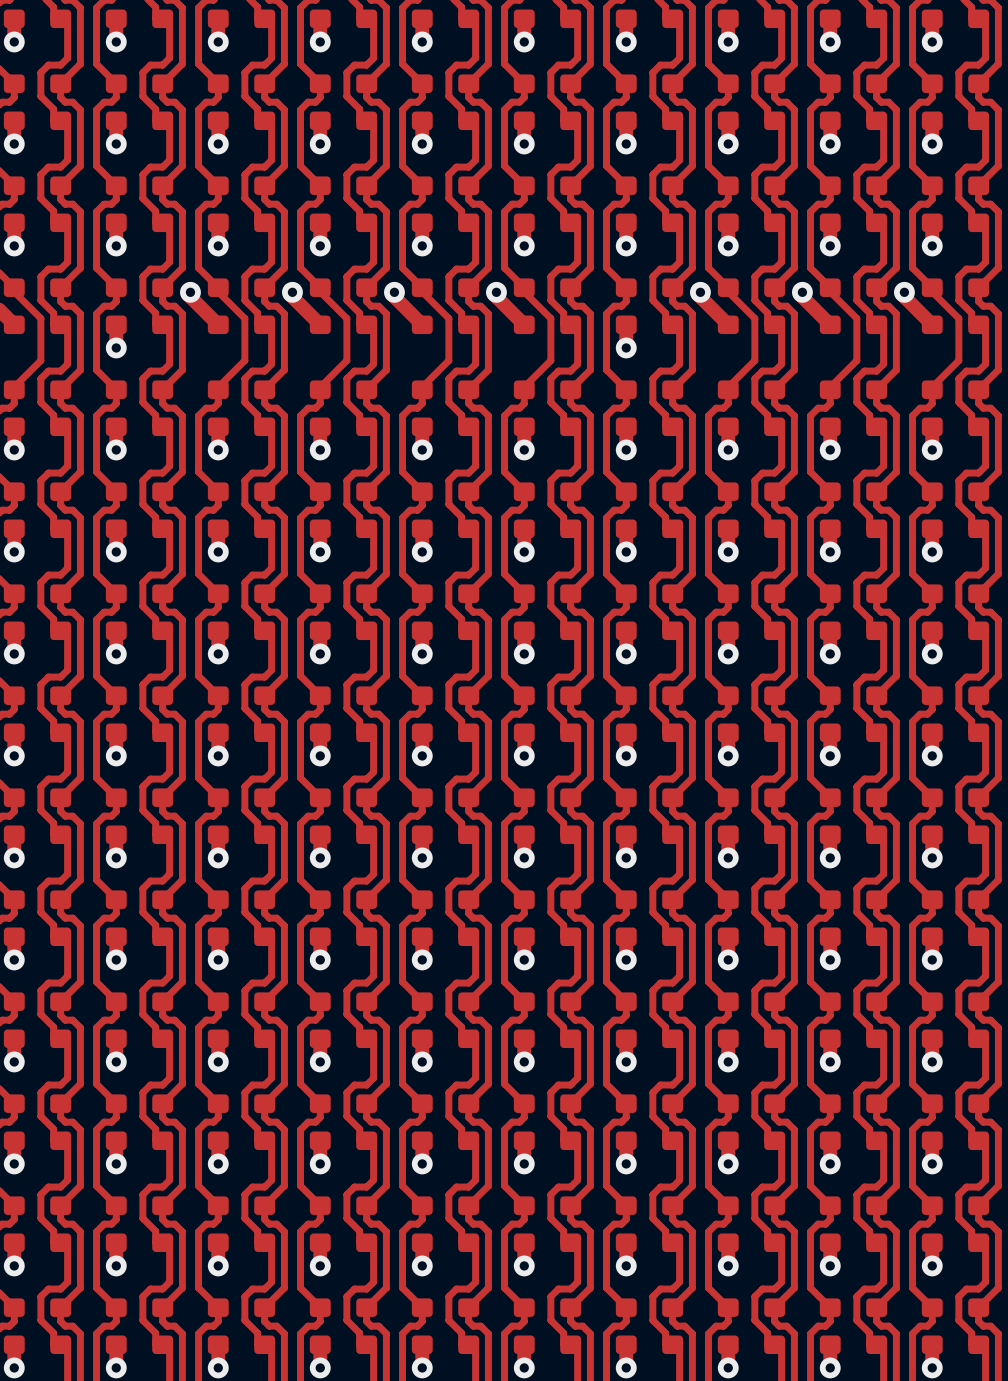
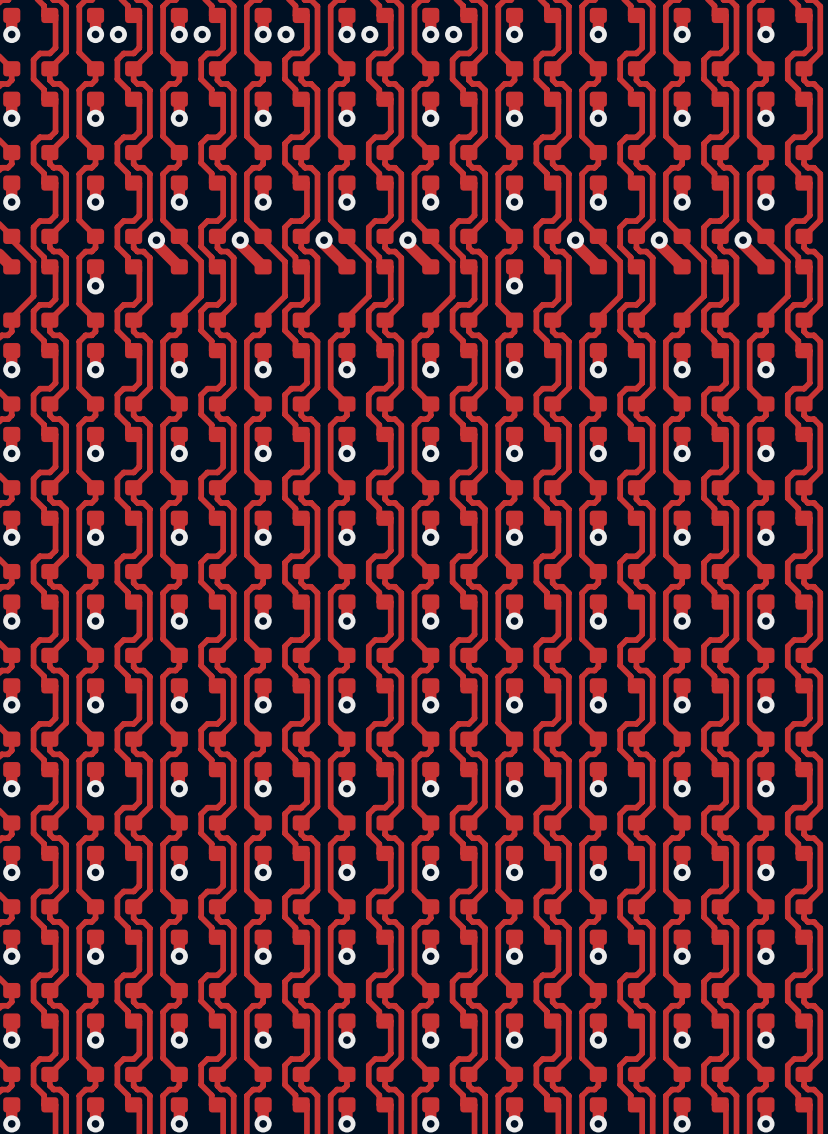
via: none -> (118, 34)
via: none -> (202, 34)
via: none -> (285, 34)
via: none -> (369, 34)
via: none -> (453, 34)

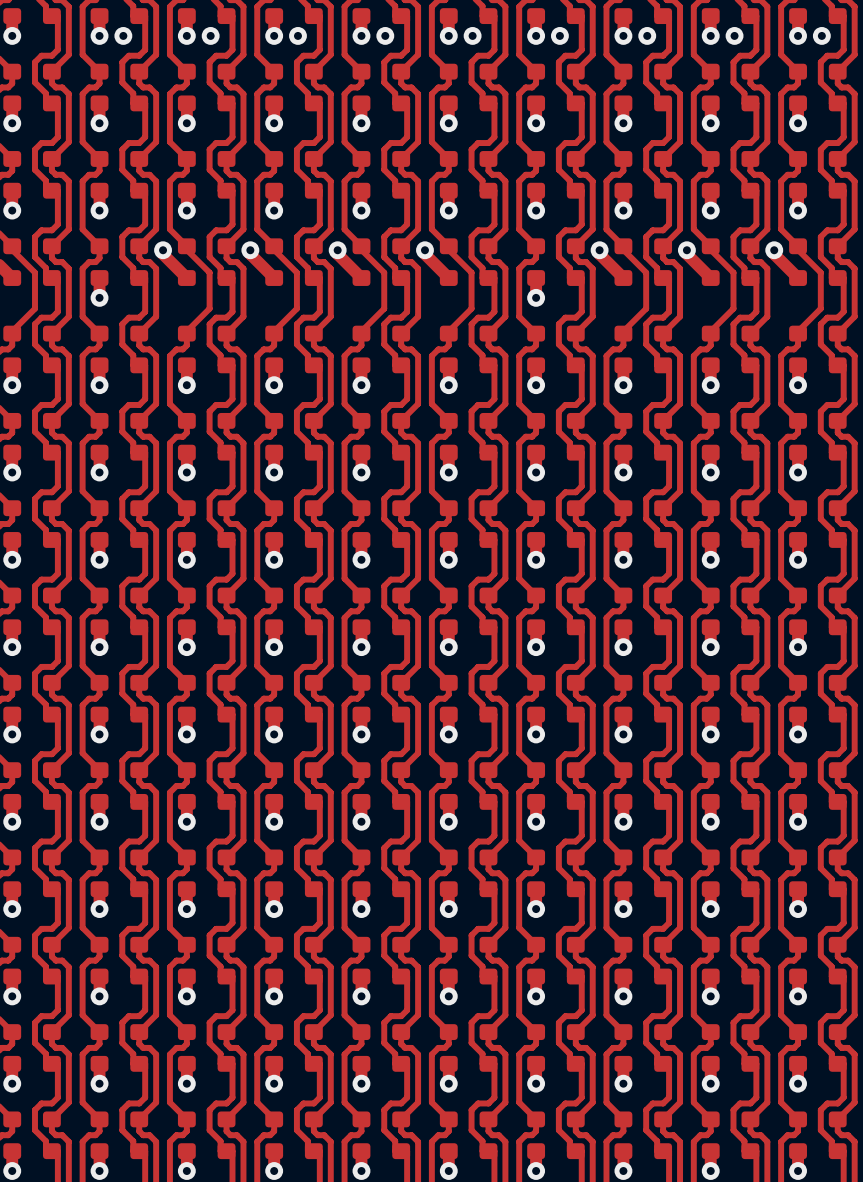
via: none -> (559, 35)
via: none -> (647, 35)
via: none -> (734, 35)
via: none -> (821, 35)

